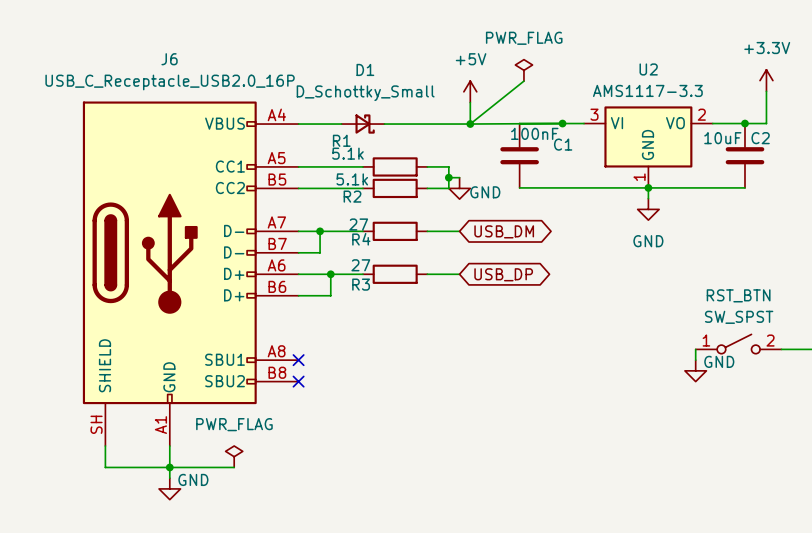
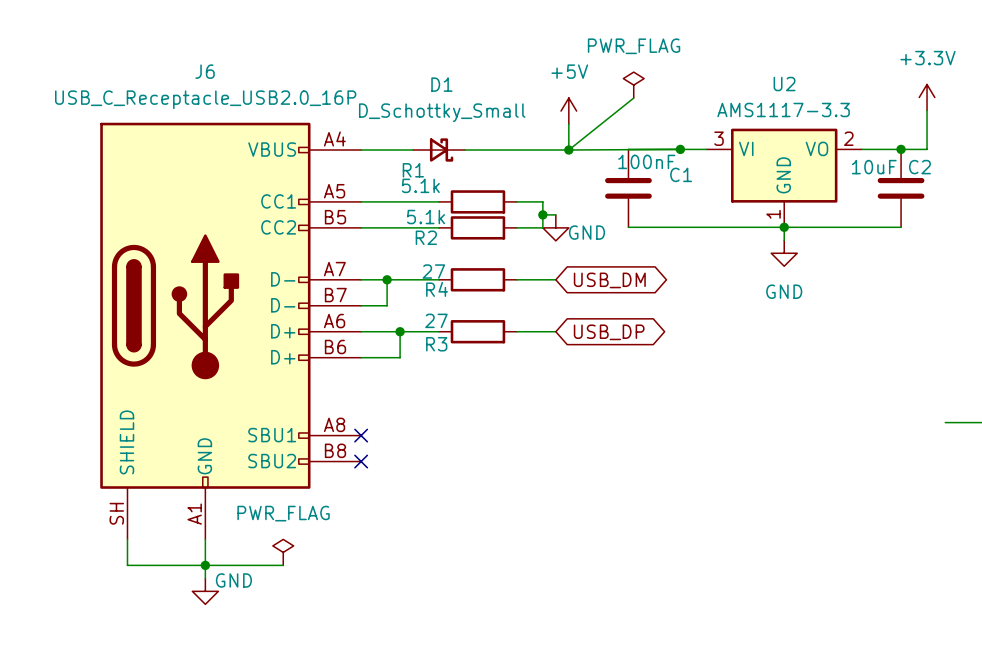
RST_BTN: SW_SPST (738, 344) -> none
wire: (695, 349) (695, 360) -> none
power symbol: GND (695, 370) -> none

